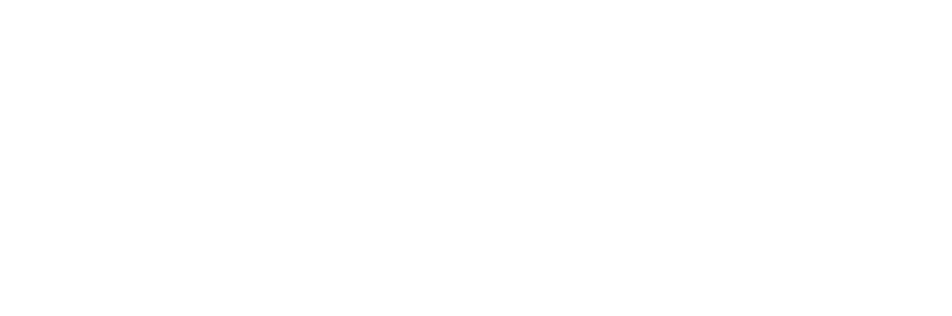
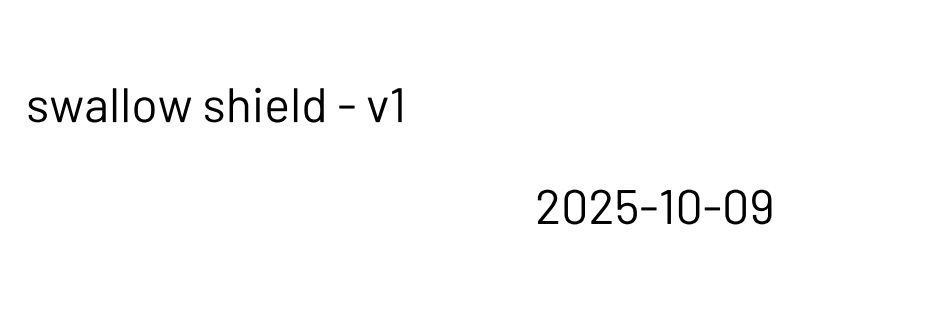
label: none -> swallow shield - v1 (215, 105)
label: none -> 2025-10-09 (654, 207)

